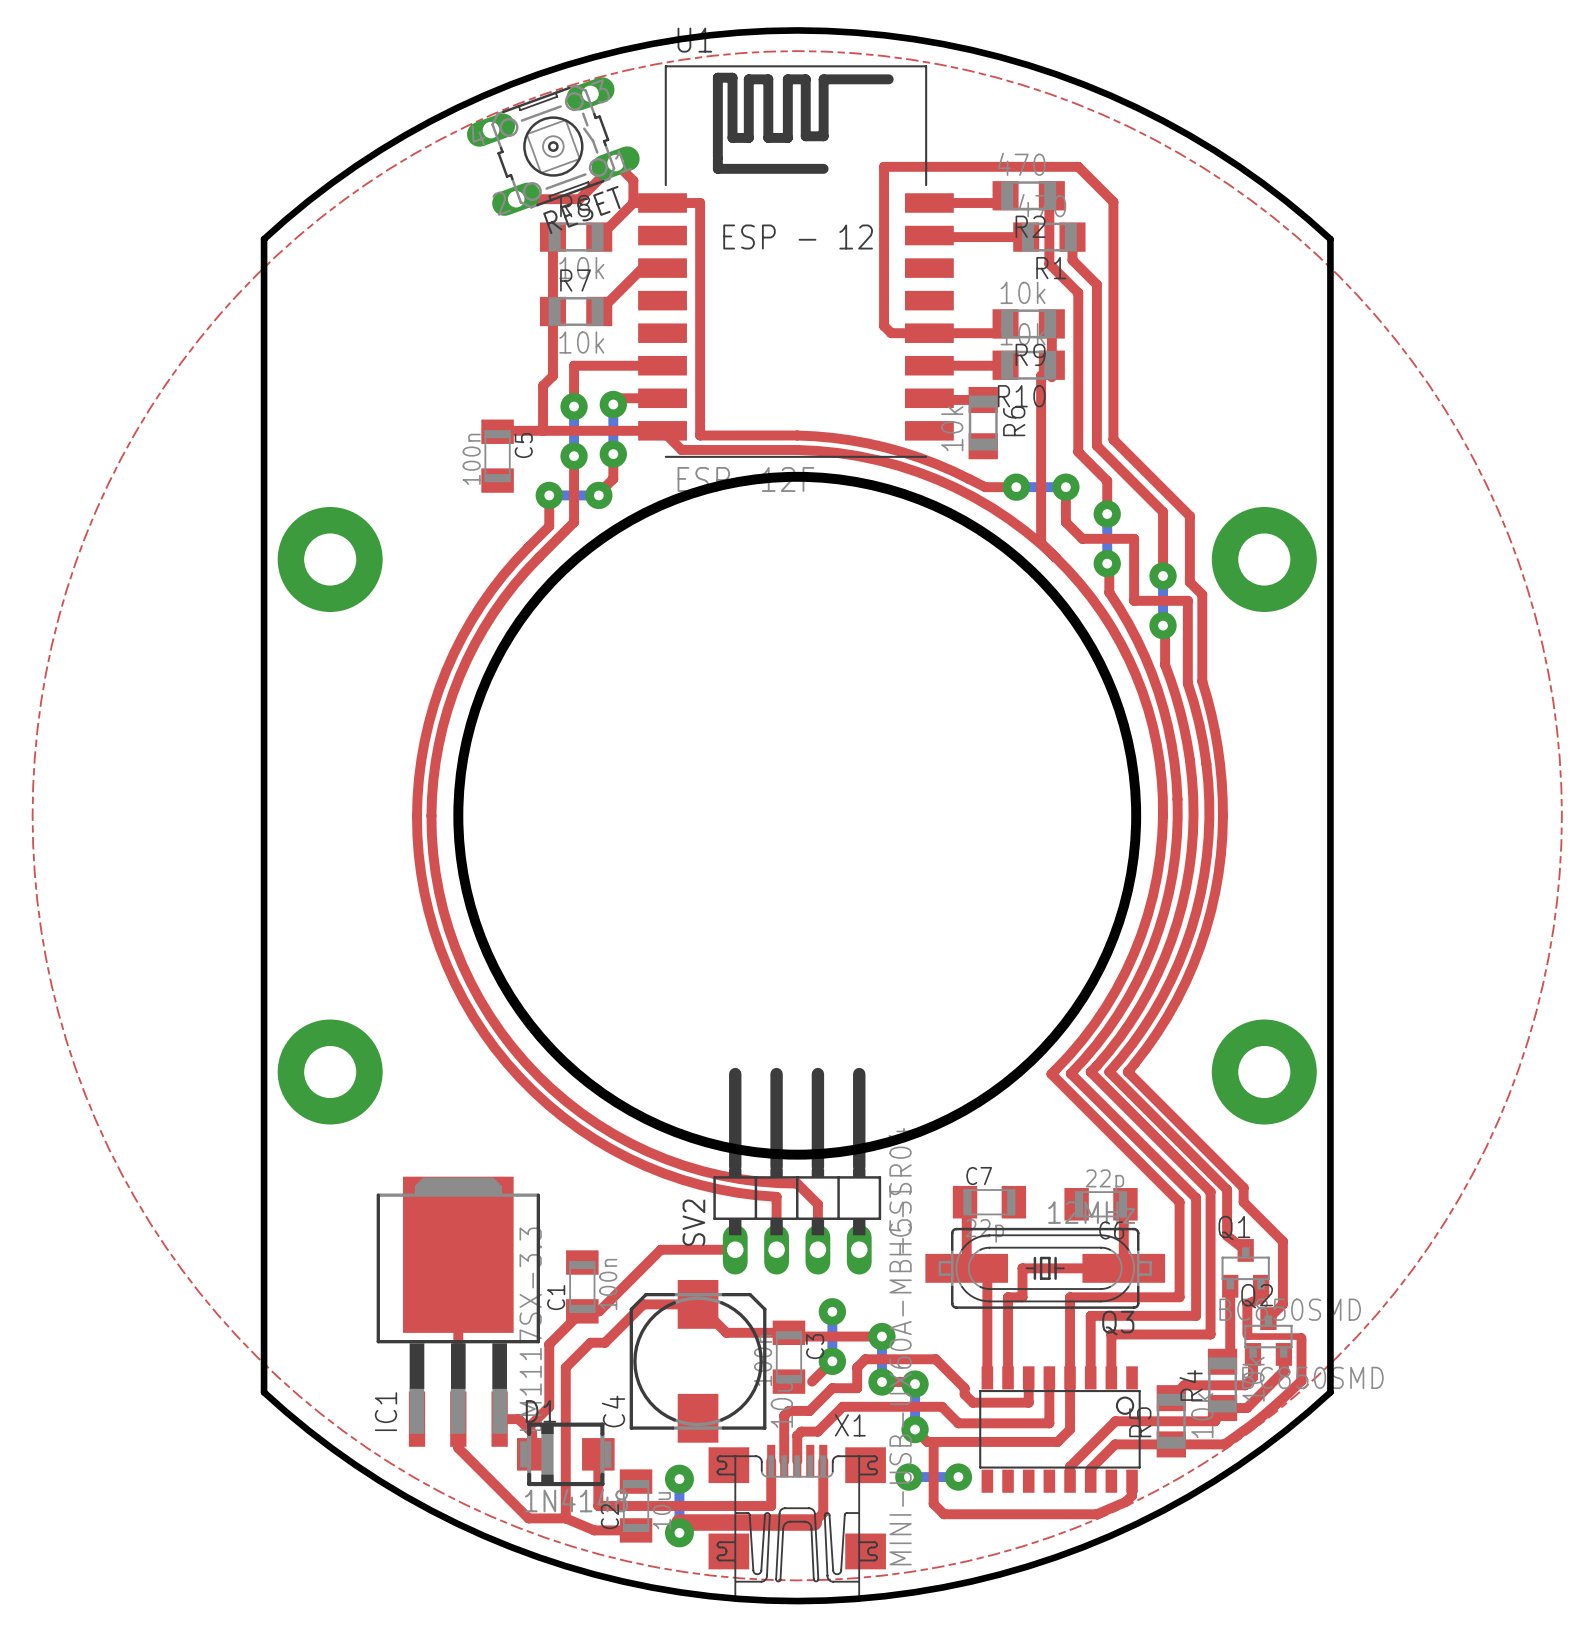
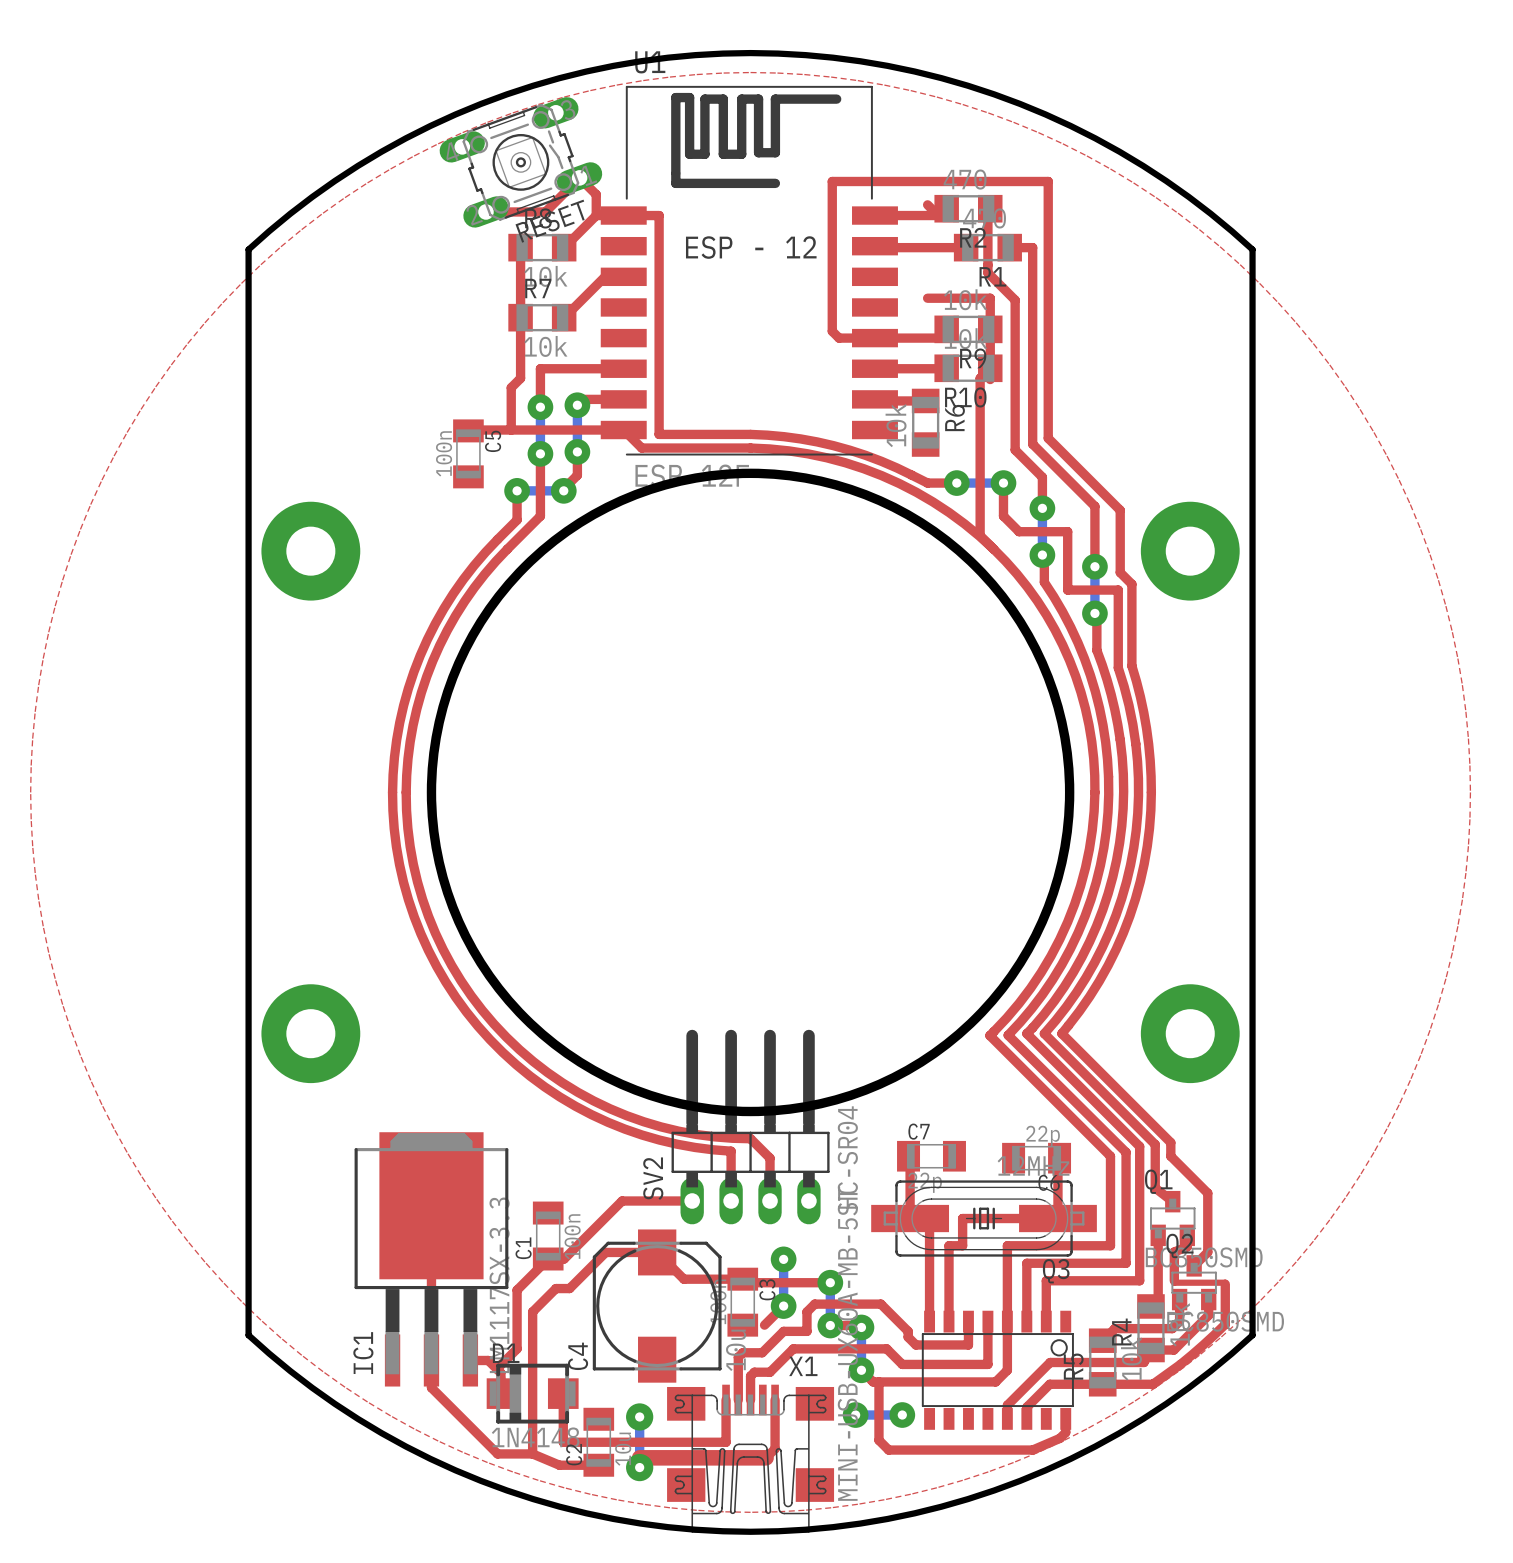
top track: (1078, 166) (1113, 201) -> (1015, 181) (1048, 181) (1048, 214)
top track: none -> (927, 204) (938, 215)
top track: (1072, 237) (1072, 260) (1096, 284) -> (1009, 247) (1032, 247) (1032, 292)
top track: none -> (927, 298) (990, 298) (990, 329)

